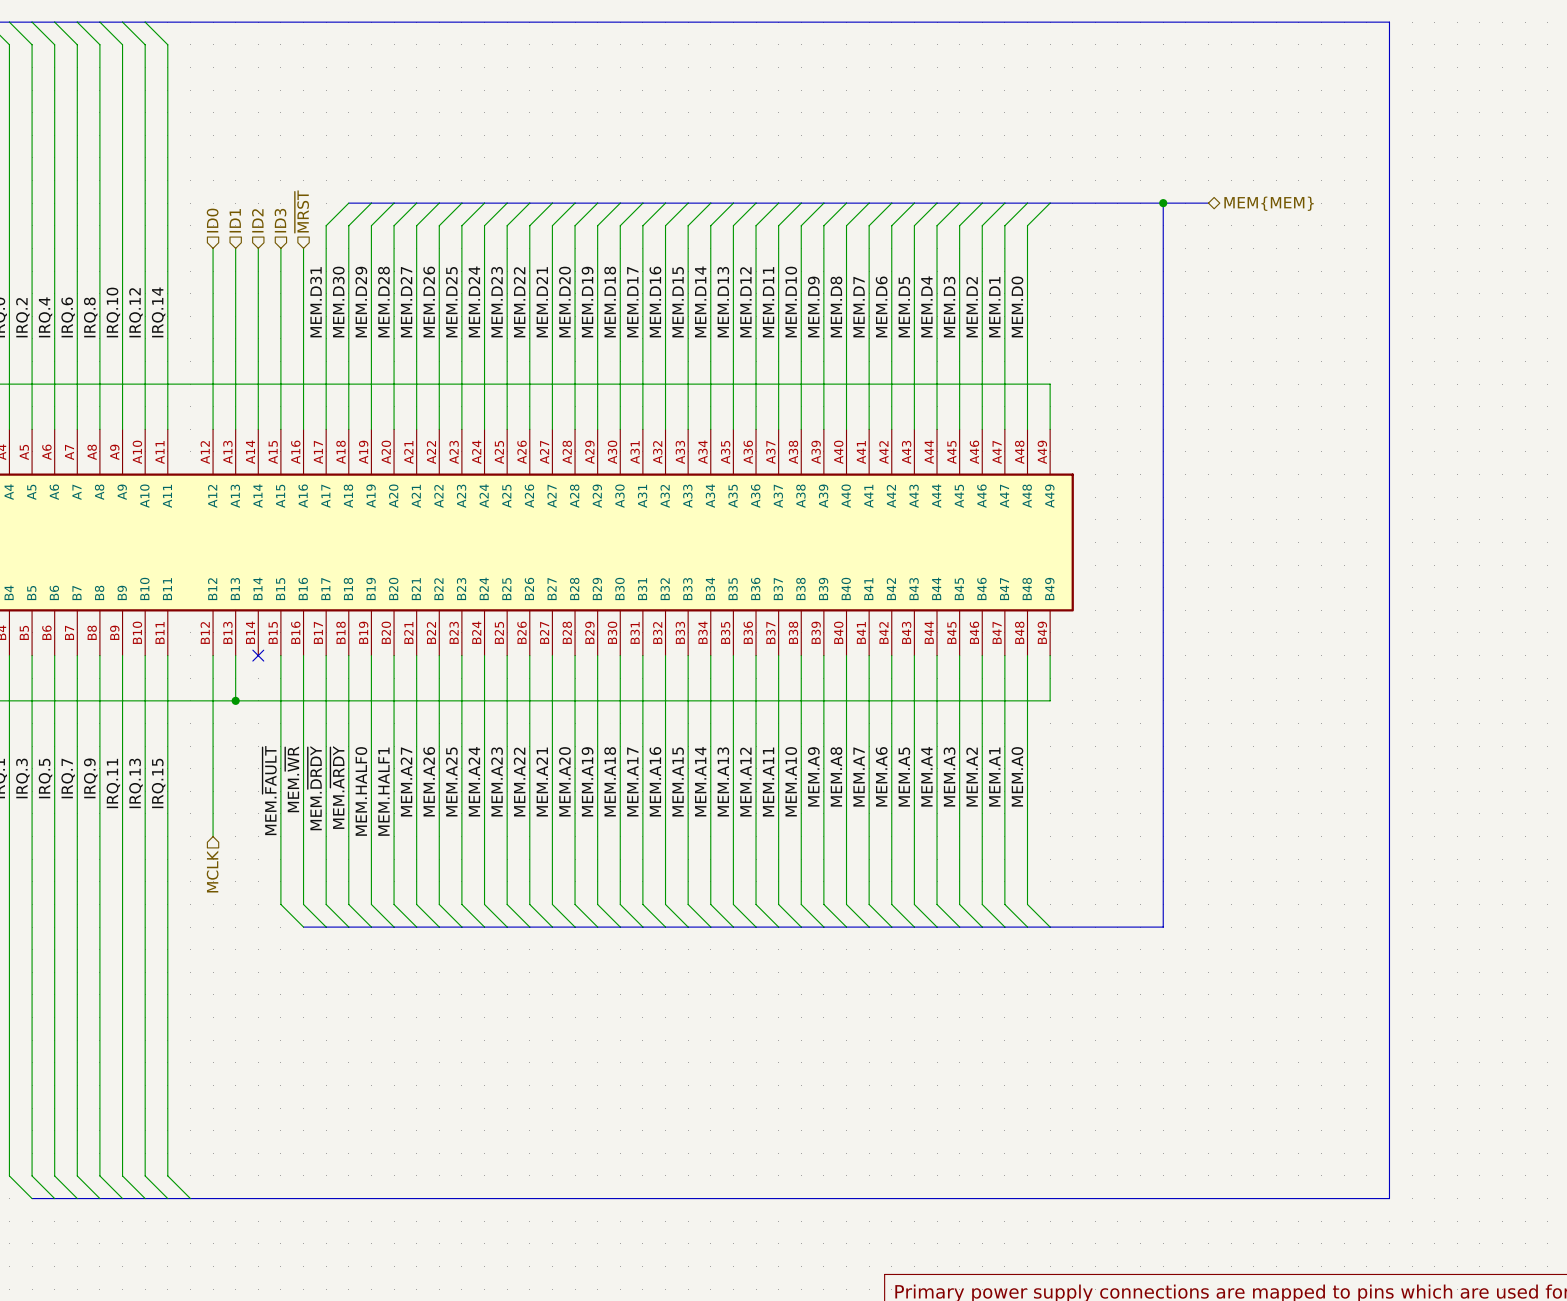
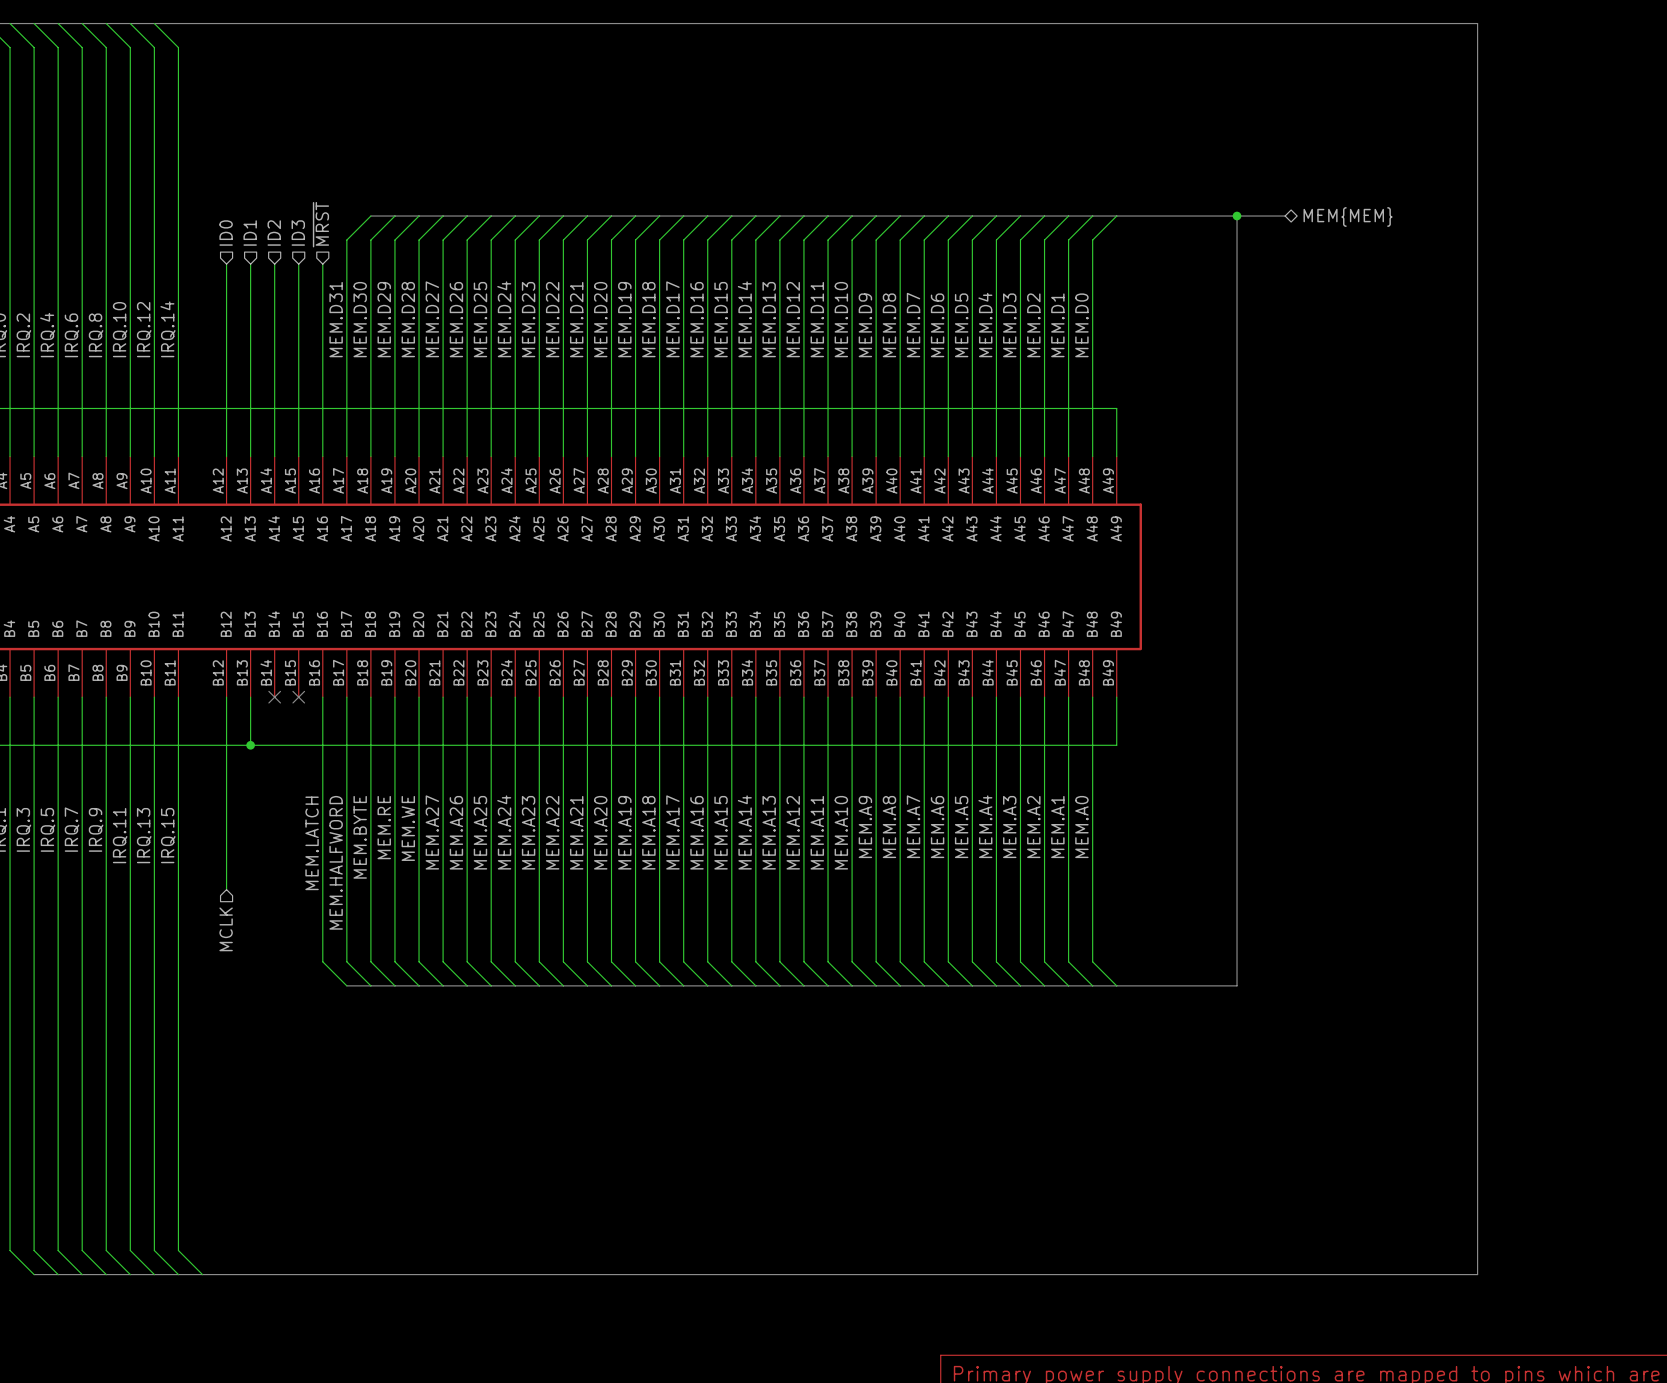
wire: (280, 655) (280, 904) (303, 927) -> none
no-connect mark: none -> (298, 697)
label: MEM.~{WR} (292, 779) -> MEM.LATCH (312, 843)
label: MEM.~{ARDY} (337, 787) -> MEM.BYTE (360, 837)
label: MEM.~{DRDY} (314, 788) -> MEM.HALFWORD (336, 862)
label: MEM.~{FAULT} (269, 790) -> none
label: MEM.HALF0 (361, 791) -> MEM.RE (384, 827)
label: MEM.HALF1 (383, 791) -> MEM.WE (408, 828)
bus: (303, 927) (326, 927) -> none

